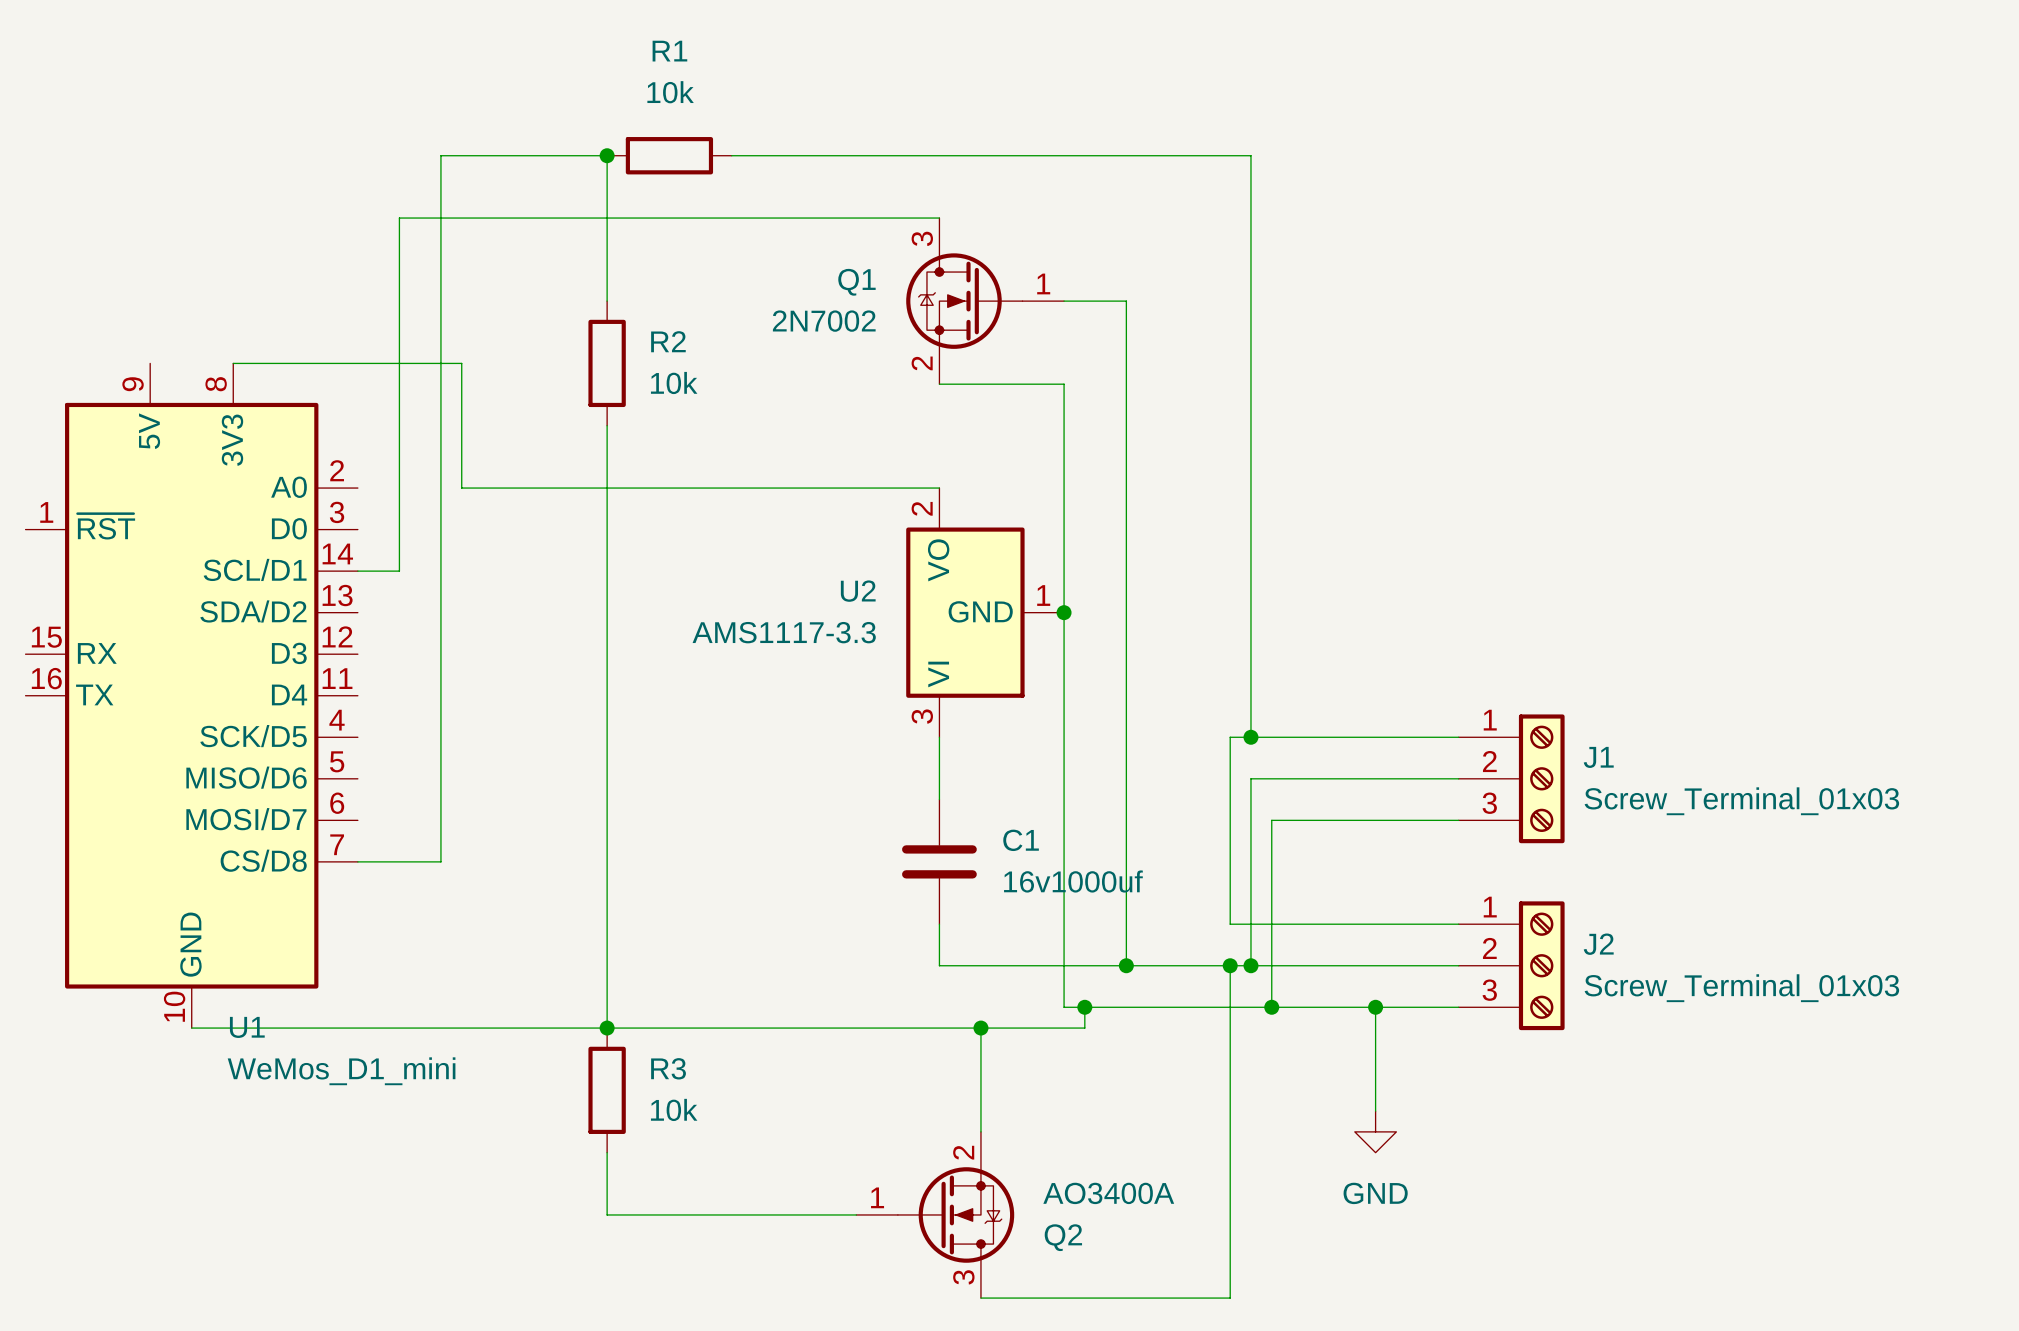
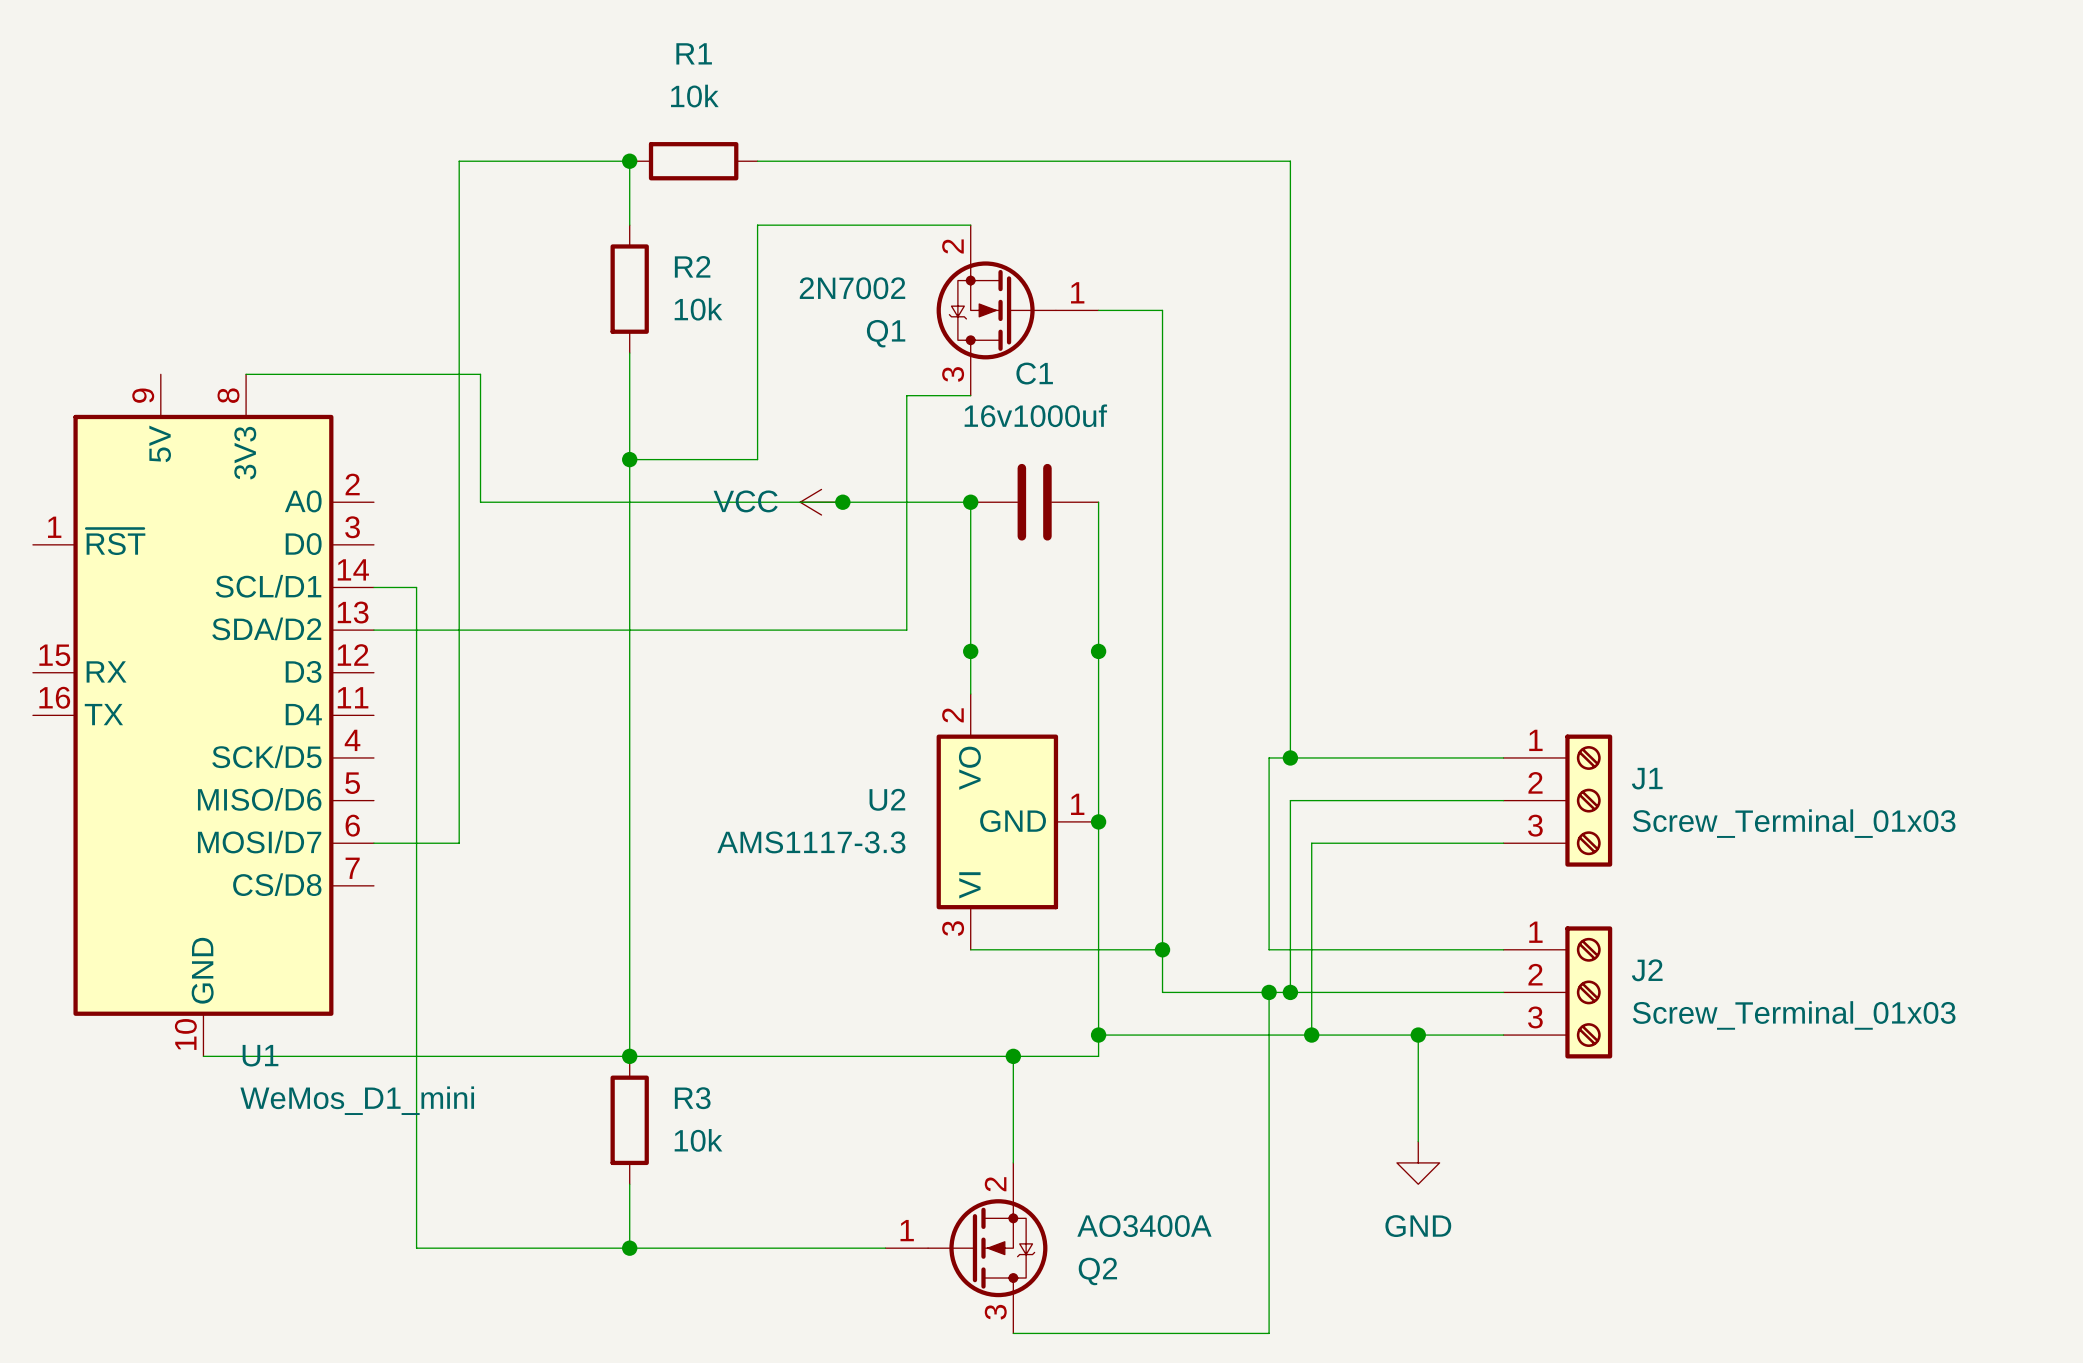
wire: (607, 218) (607, 301) -> (629, 353) (629, 438)
wire: (731, 218) (399, 218) (399, 571) -> (757, 225) (757, 459) (629, 459)
Q1 flip: as is (964, 301) -> up-down (996, 310)
R2 position: (607, 363) -> (629, 289)
wire: (939, 384) (1064, 384) (1064, 488) -> (970, 395) (906, 395) (906, 630) (373, 630)
junction: none -> (629, 459)
power symbol: none -> VCC (821, 502)
junction: none -> (842, 502)
junction: none -> (970, 502)
wire: none -> (416, 587) (416, 1248) (629, 1248)
U2 position: (985, 612) -> (1017, 821)
junction position: (1064, 612) -> (1098, 651)
junction: none -> (970, 651)
junction: none -> (1098, 821)
wire: (440, 820) (440, 861) (357, 861) -> (459, 843) (373, 843)
C1 name position: C1 (1021, 840) -> C1 (1034, 373)
C1 rotation: 0° (939, 861) -> 90° clockwise (1034, 502)
C1 position: (939, 861) -> (1034, 502)
C1 value position: 16v1000uf (1073, 881) -> 16v1000uf (1035, 415)
wire: (939, 924) (939, 965) (1126, 965) -> (970, 949) (1162, 949)
junction: none -> (1162, 949)
junction: (1126, 965) -> none
wire: (1084, 1007) (1084, 1028) (1064, 1028) -> (1098, 1035) (1098, 1056)
junction position: (1084, 1007) -> (1098, 1035)
junction: none -> (629, 1248)

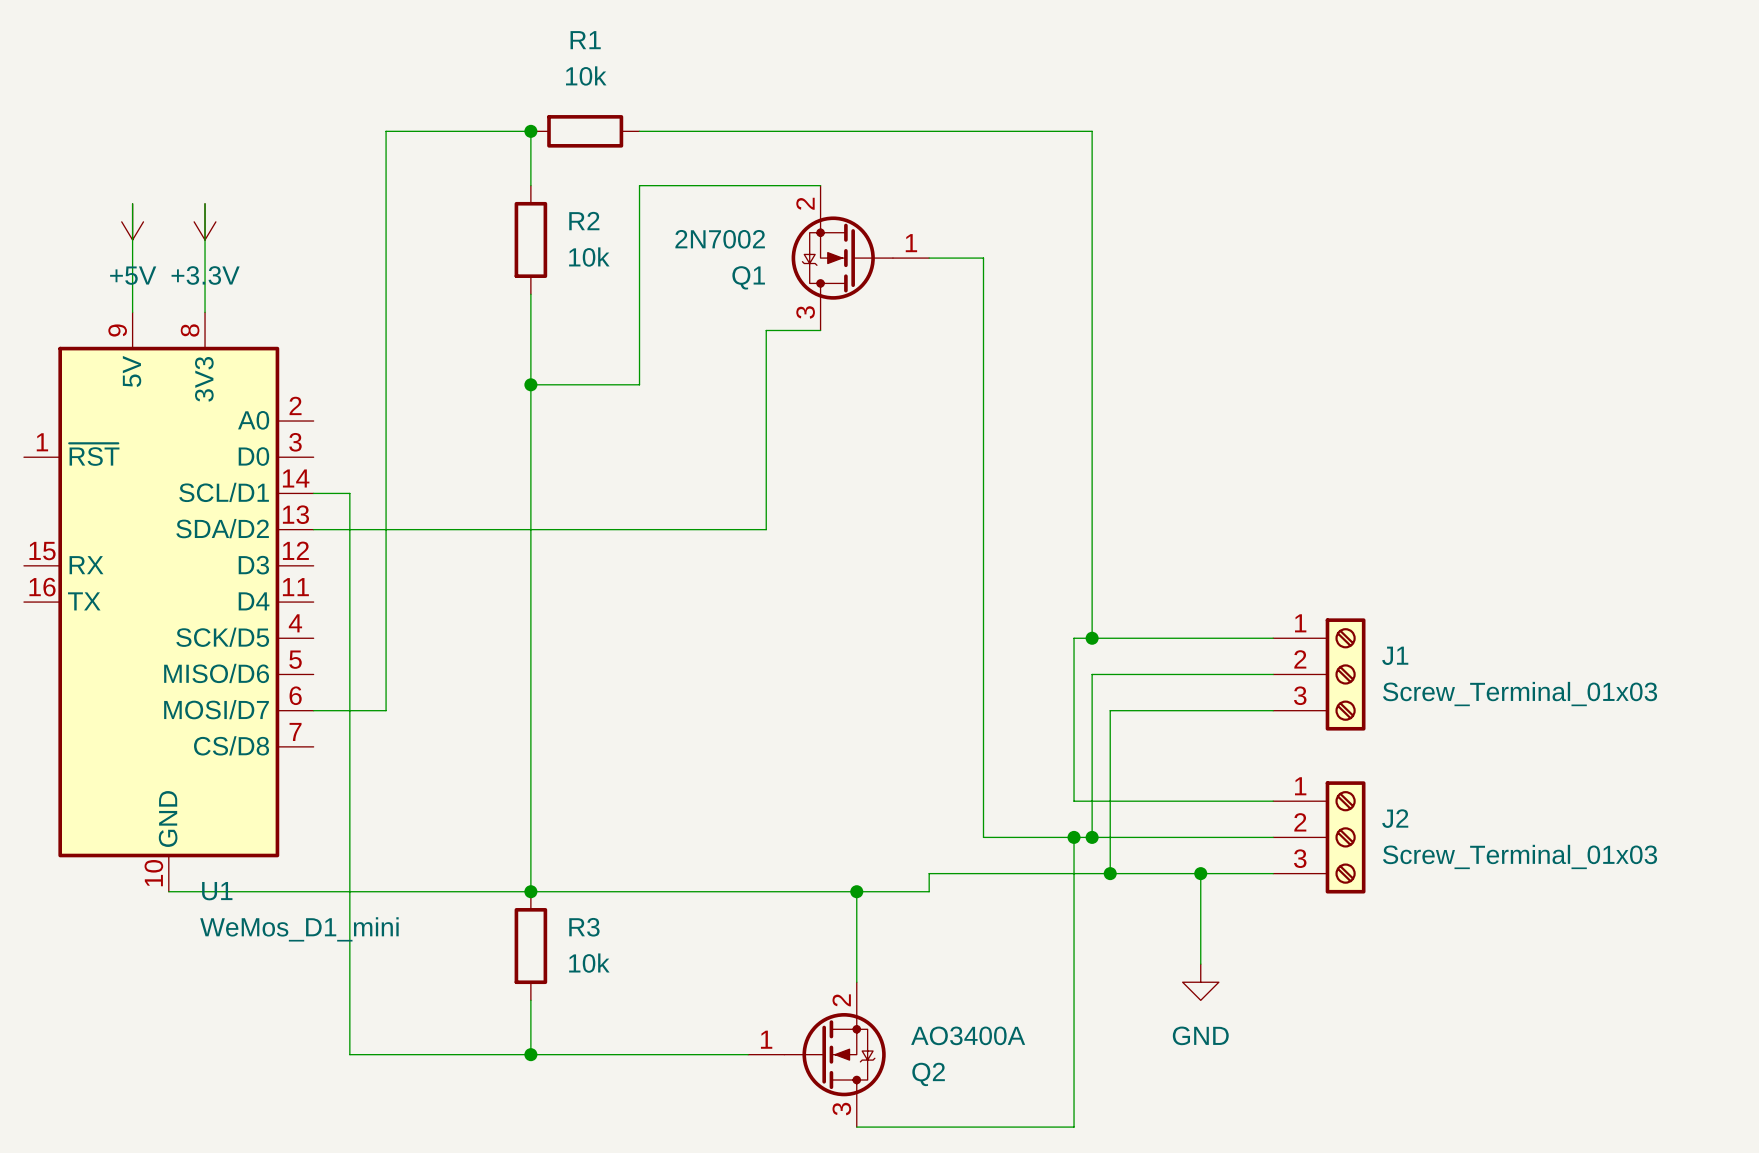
wire: none -> (132, 203) (132, 312)
power symbol: none -> +5V (132, 221)
power symbol: none -> +3.3V (205, 221)
wire: (246, 374) (480, 374) (480, 502) (970, 502) (970, 694) -> (205, 312) (205, 203)
power symbol: VCC (821, 502) -> none
junction: (842, 502) -> none
junction: (970, 502) -> none
C1: 16v1000uf (1034, 502) -> none
wire: (1098, 502) (1098, 1035) -> none
junction: (970, 651) -> none
junction: (1098, 651) -> none
U2: AMS1117-3.3 (1017, 821) -> none
junction: (1098, 821) -> none
wire: (970, 949) (1162, 949) -> none
junction: (1162, 949) -> none
junction: (1098, 1035) -> none

